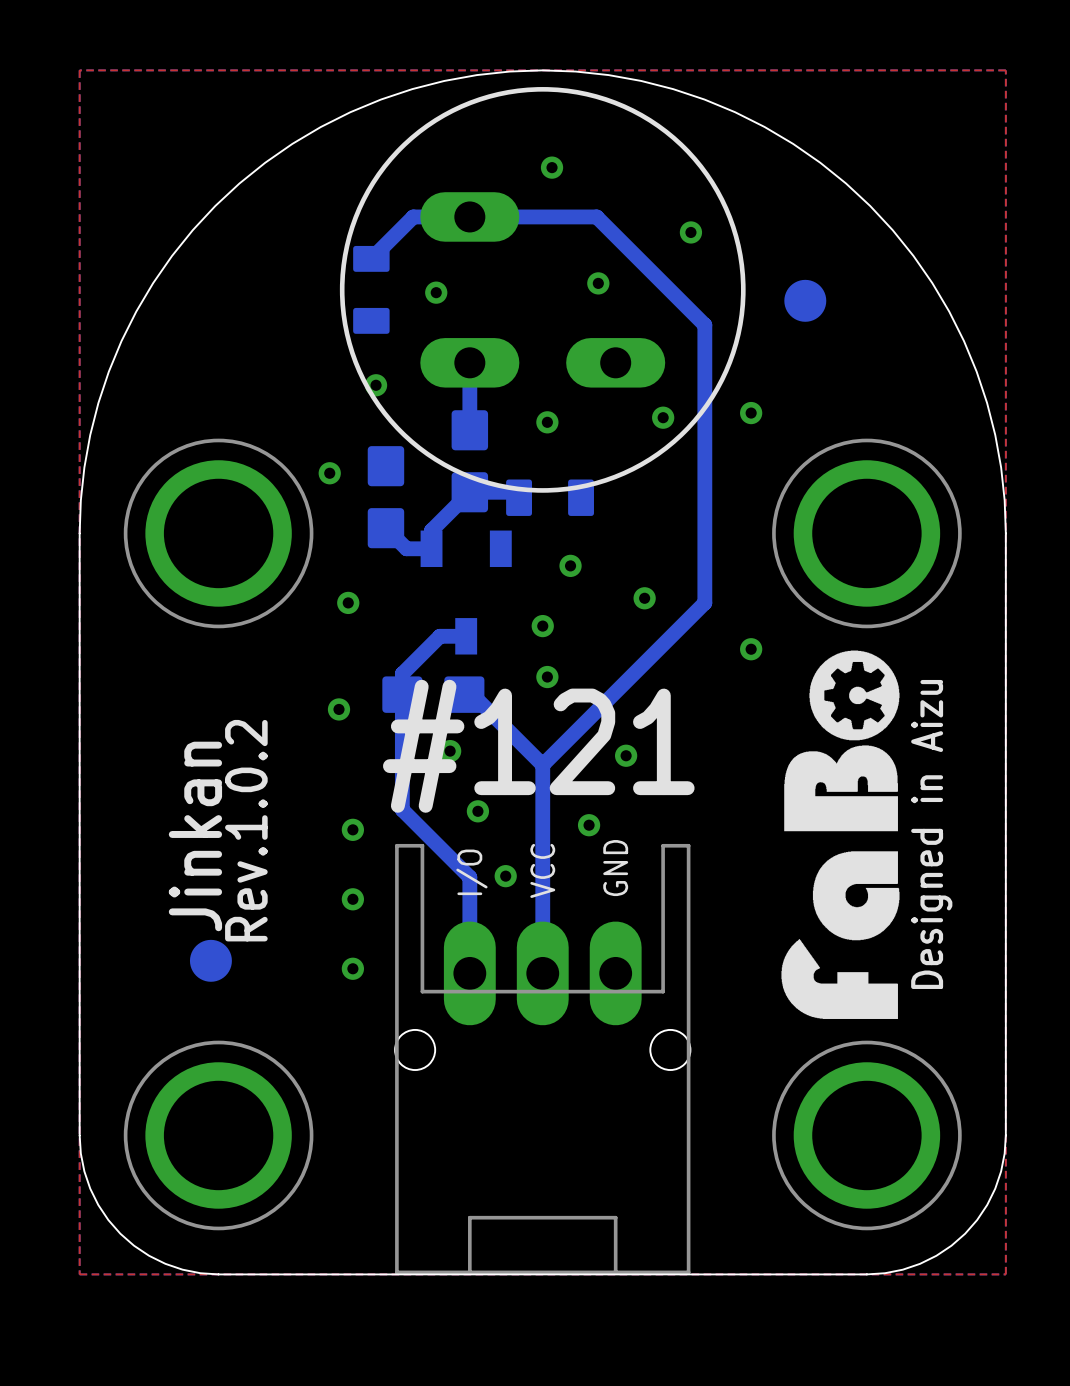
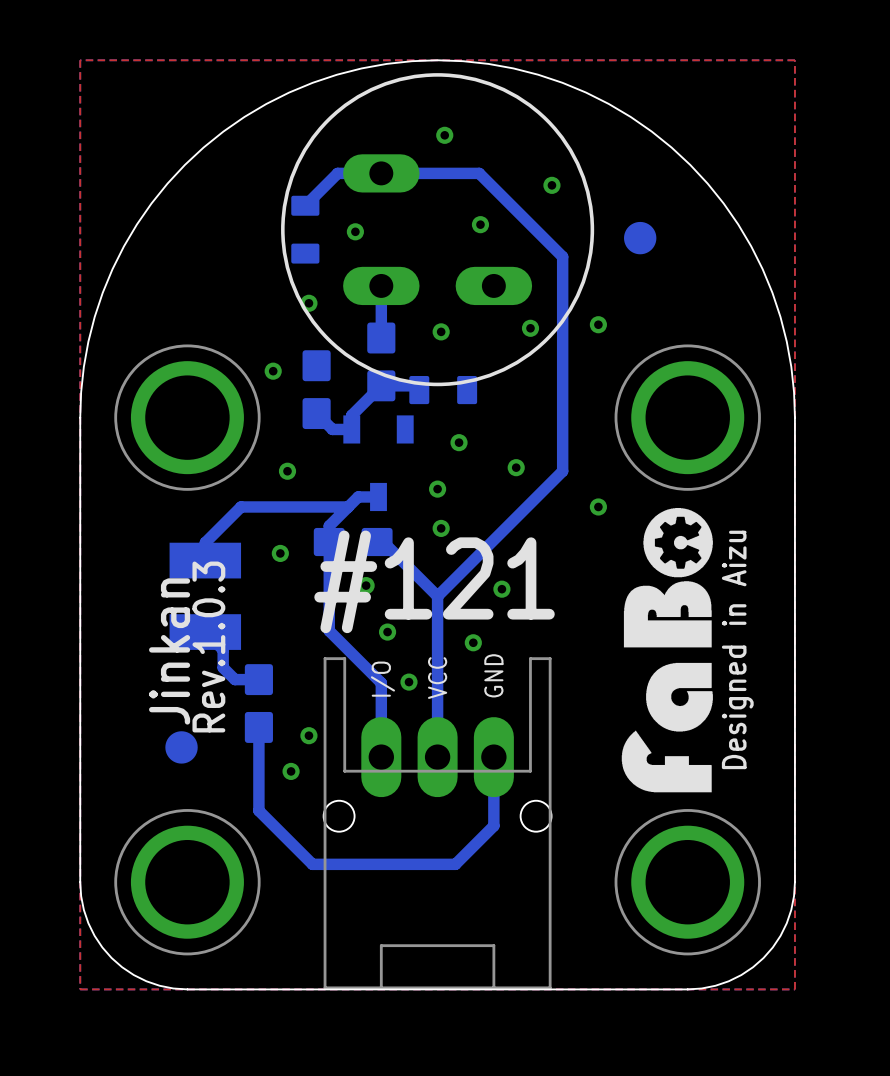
bottom track: none -> (348, 506) (241, 506) (205, 542) (205, 560)
part: none -> (205, 596)
bottom track: none -> (205, 632) (223, 649) (223, 667) (234, 679) (258, 679)
via: (352, 829) -> none
text: Rev.1.0.2 (246, 830) -> Rev.1.0.3 (208, 647)
via: (352, 899) -> none
part: none -> (258, 703)
bottom track: none -> (258, 727) (258, 810) (312, 864) (455, 864) (493, 825) (493, 757)
via: none -> (308, 735)
via: (352, 968) -> none
via: none -> (291, 771)

